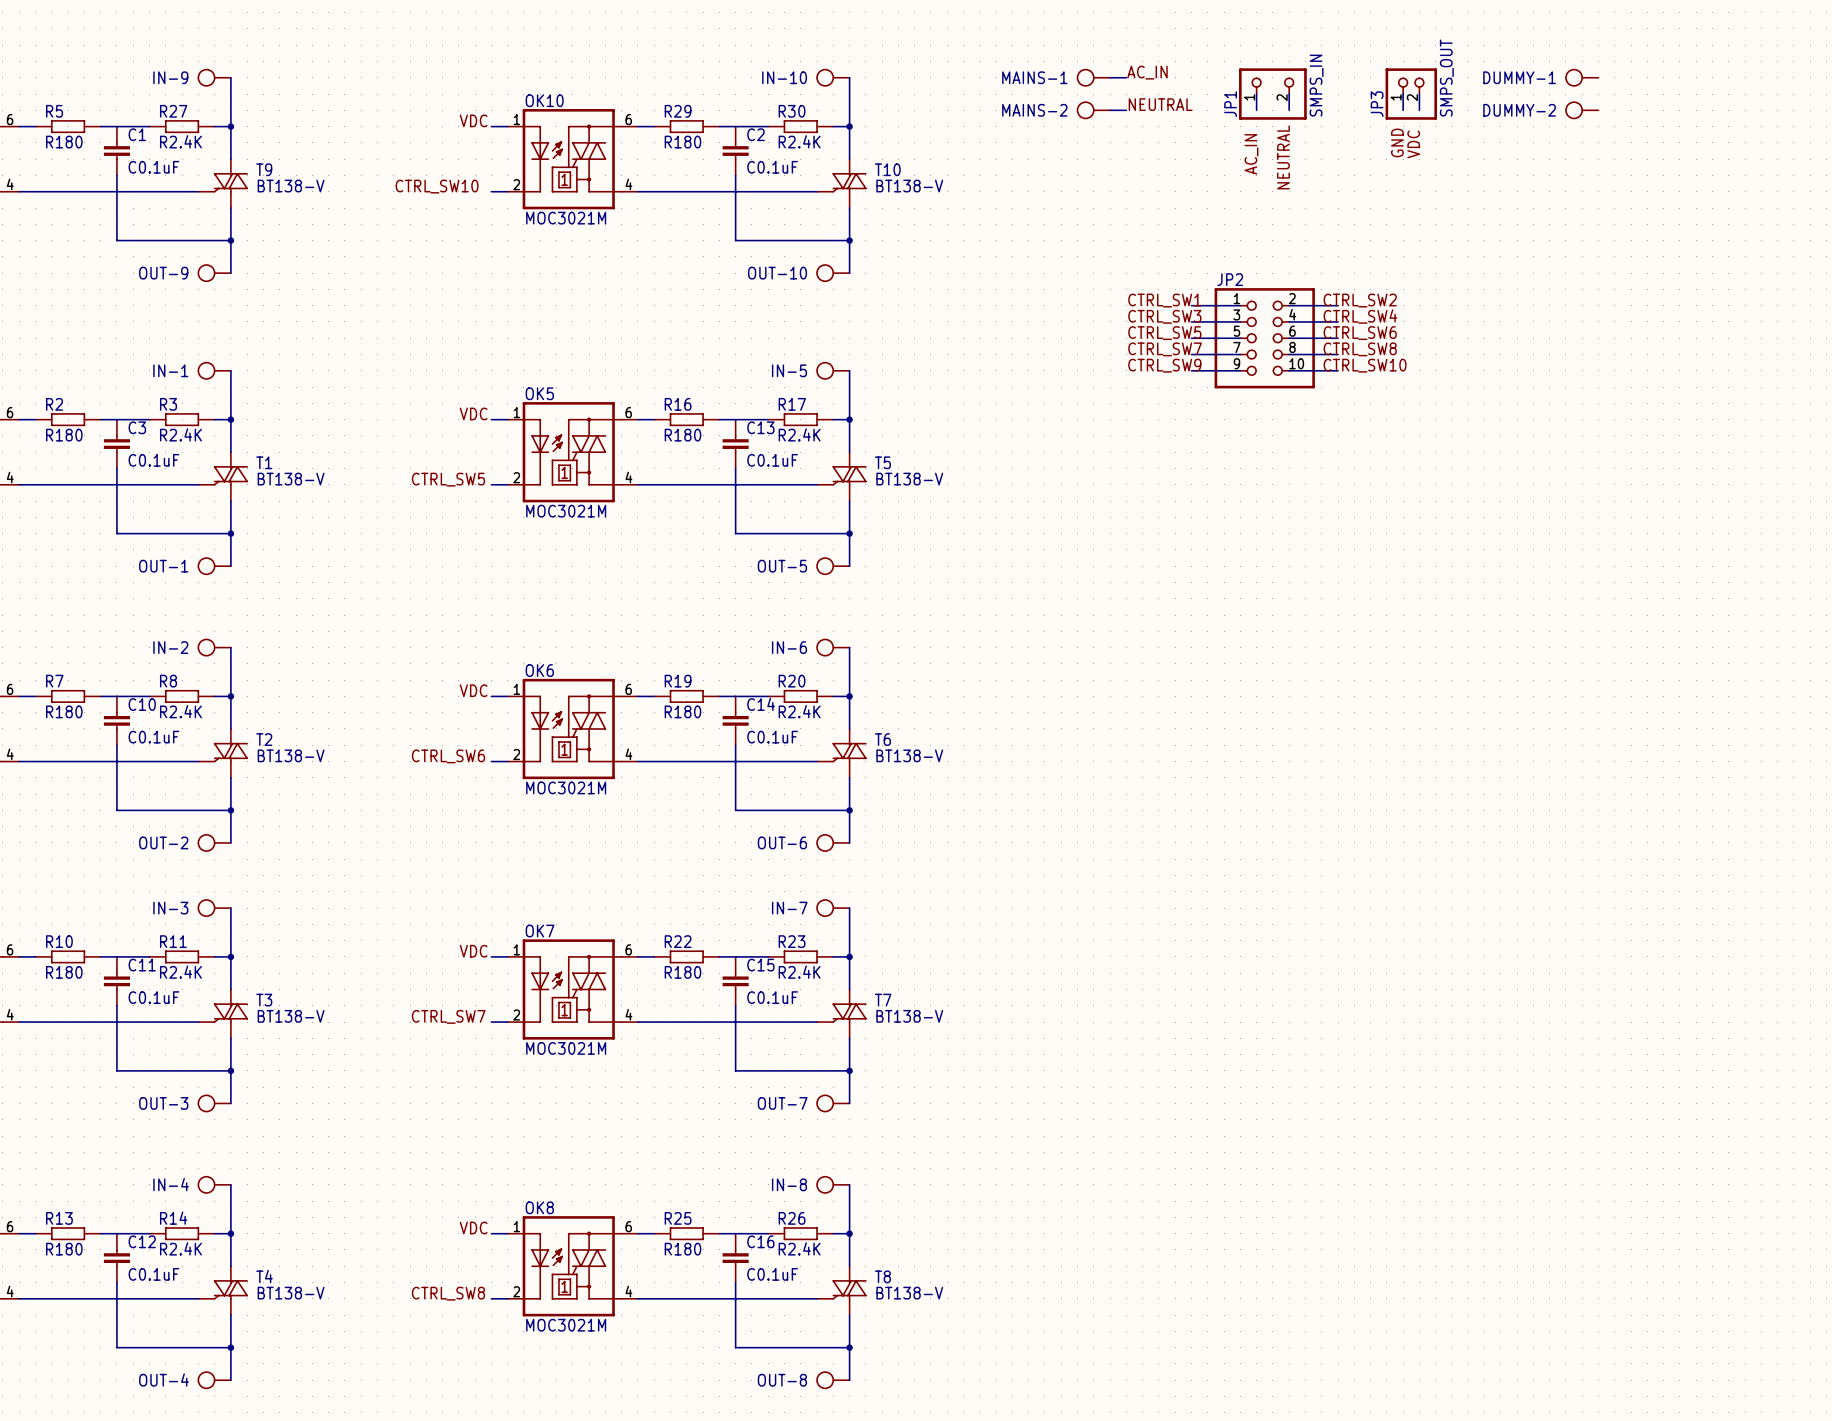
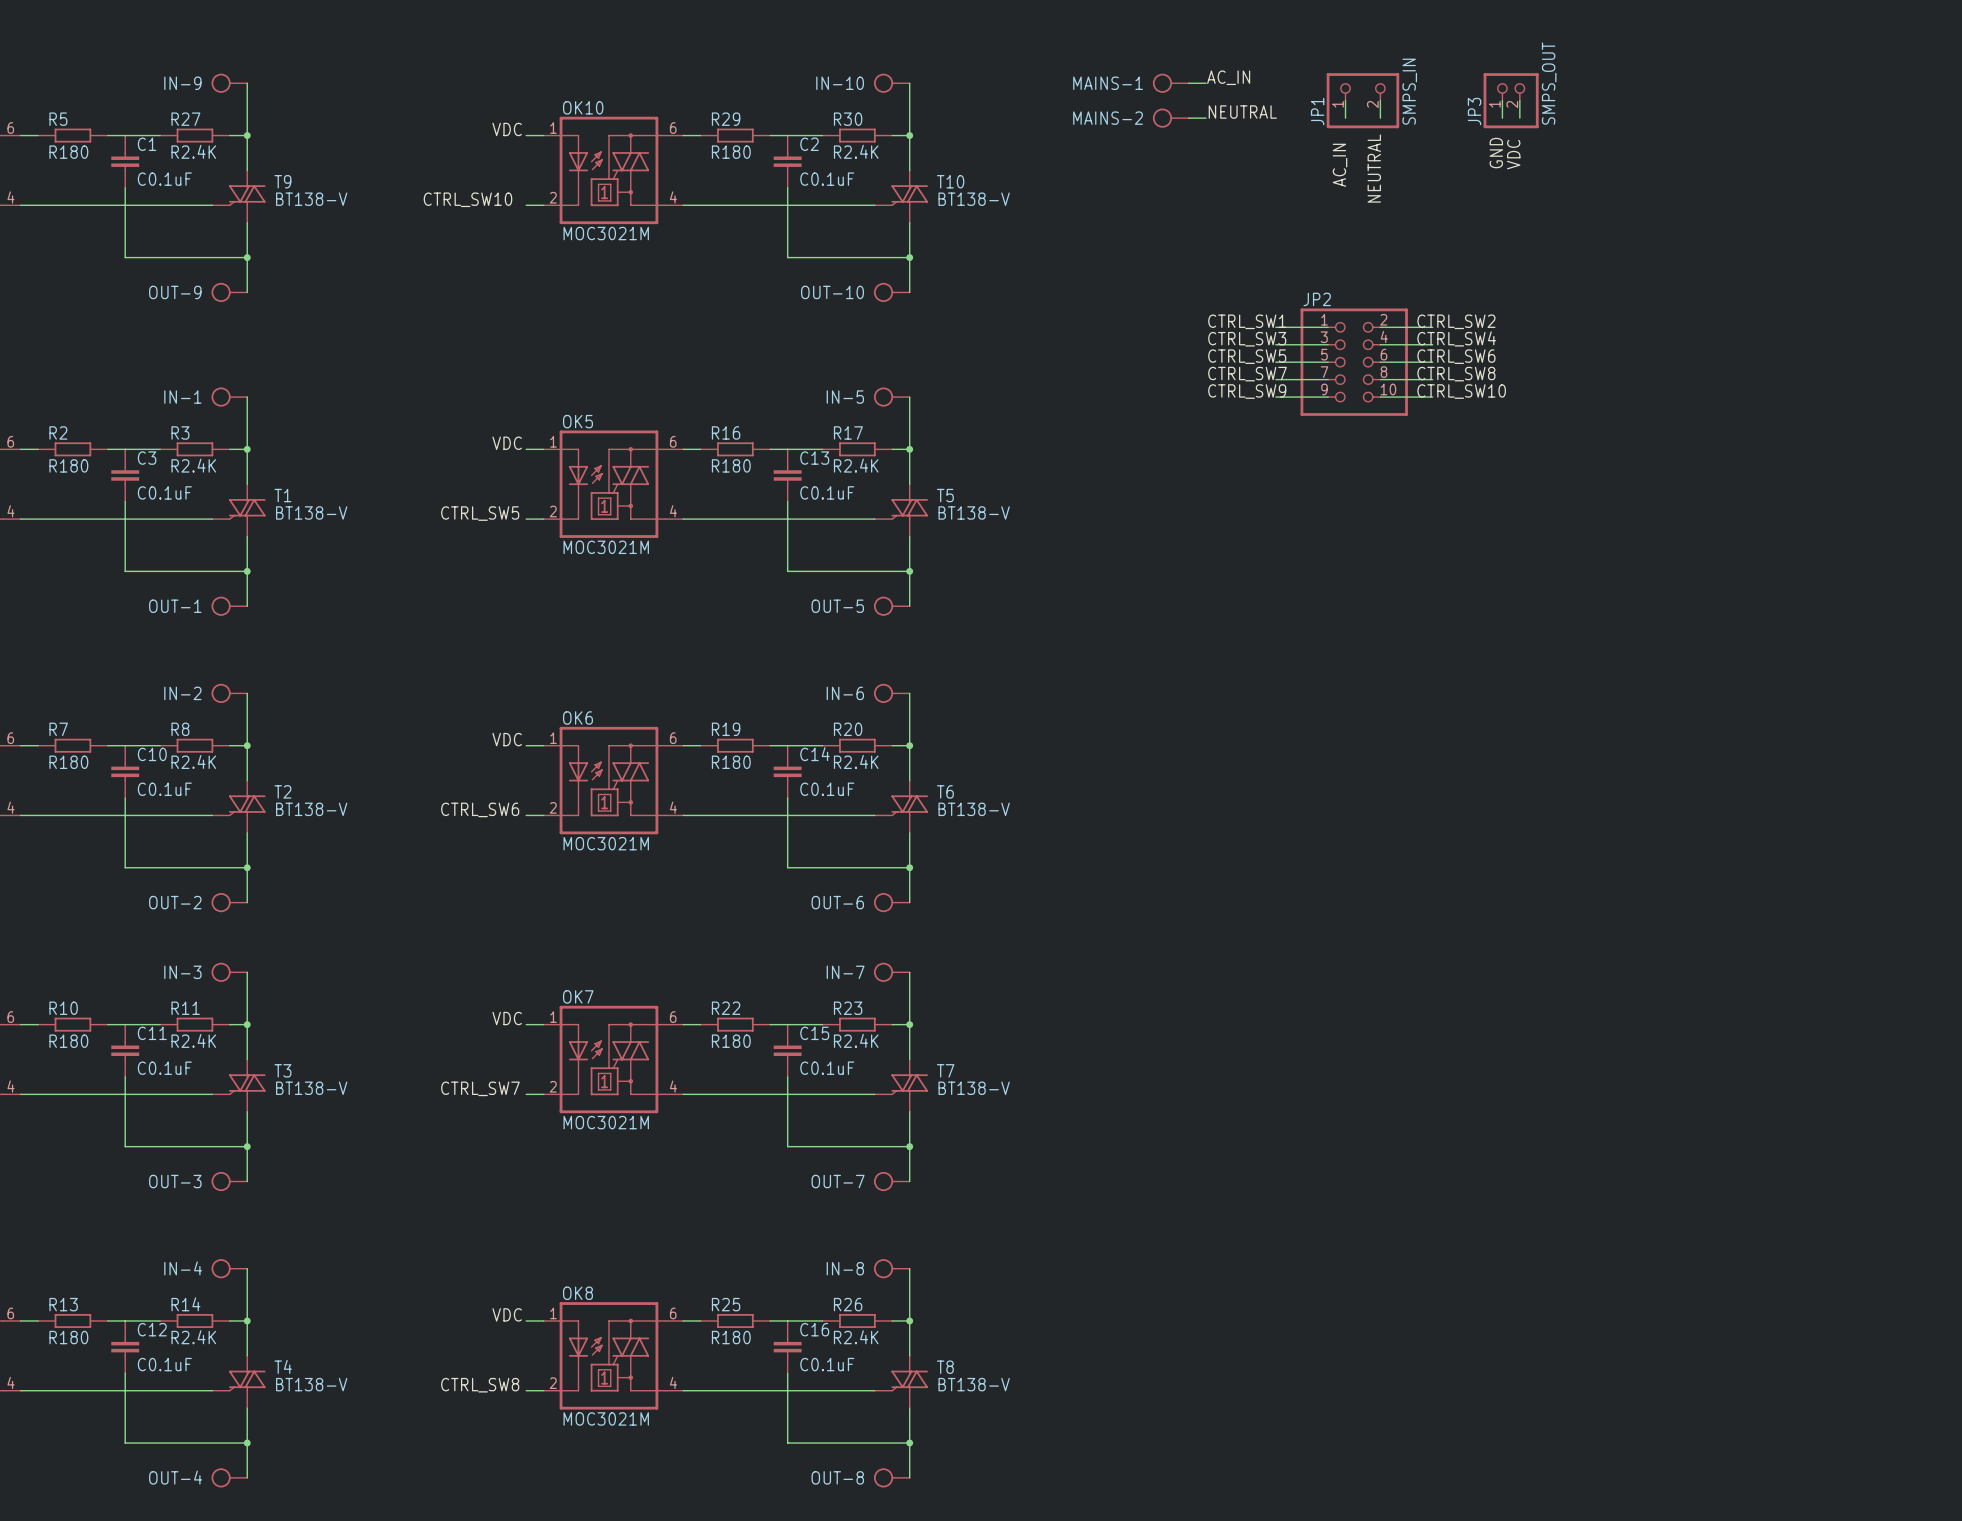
DUMMY-1: (1581, 77) -> none
DUMMY-2: (1581, 110) -> none

